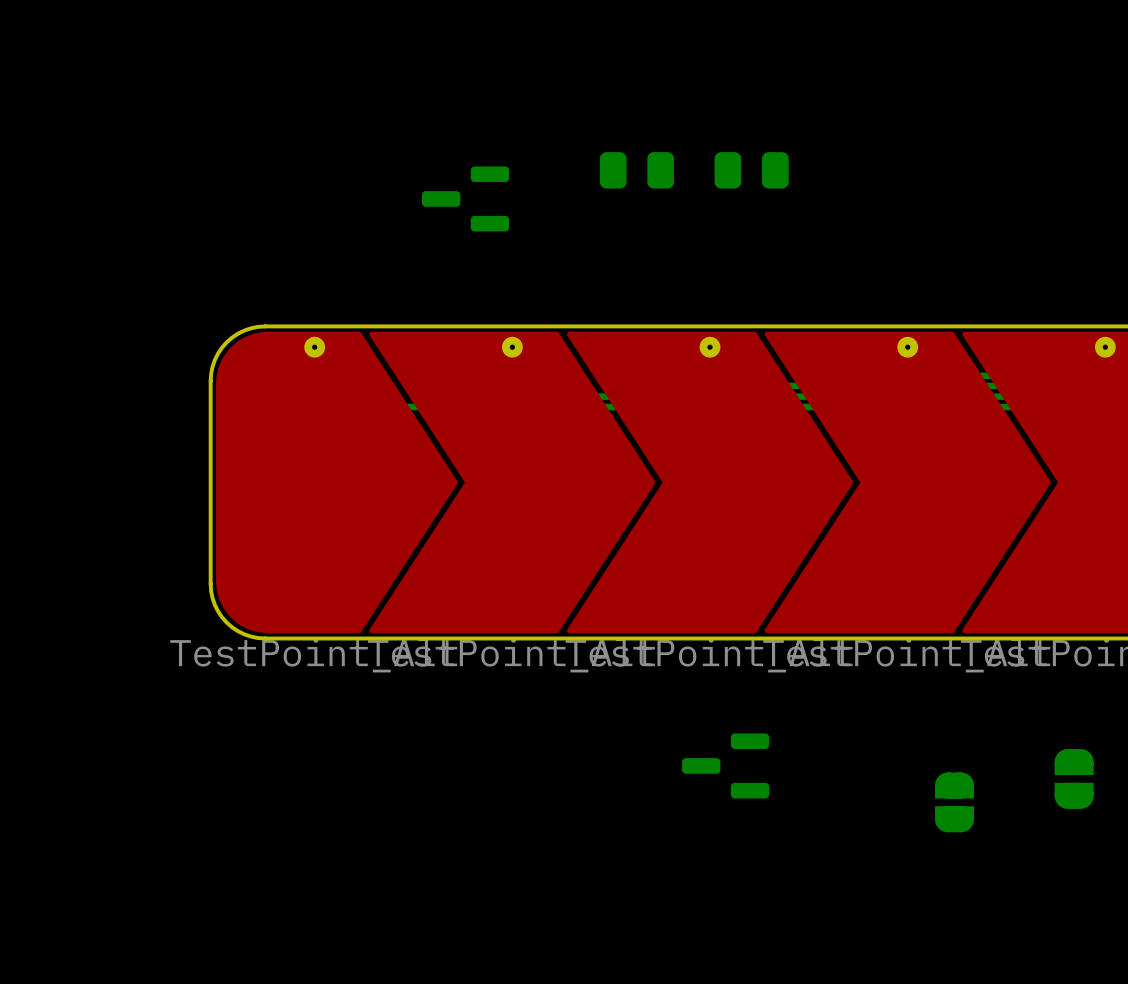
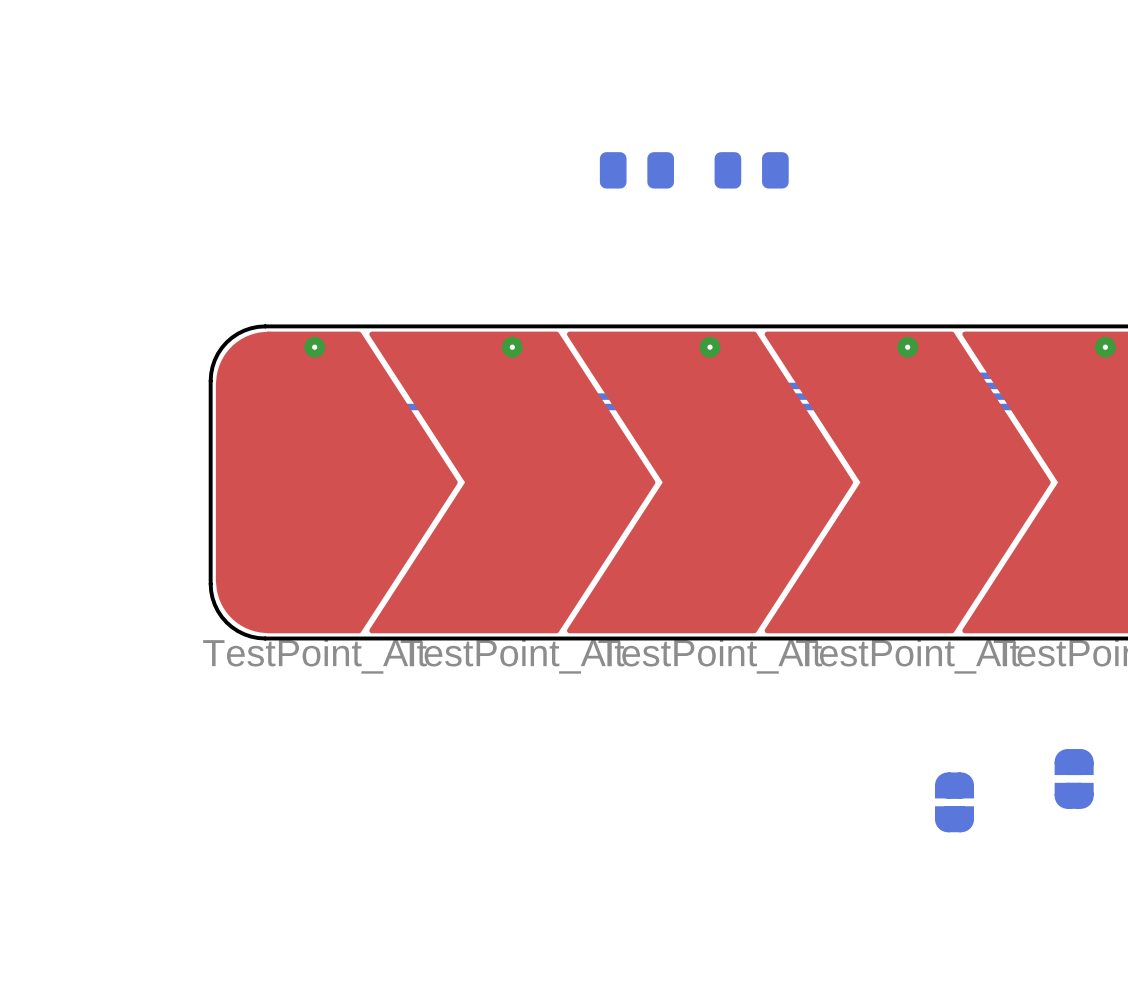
part: (465, 198) -> none
part: (725, 765) -> none

